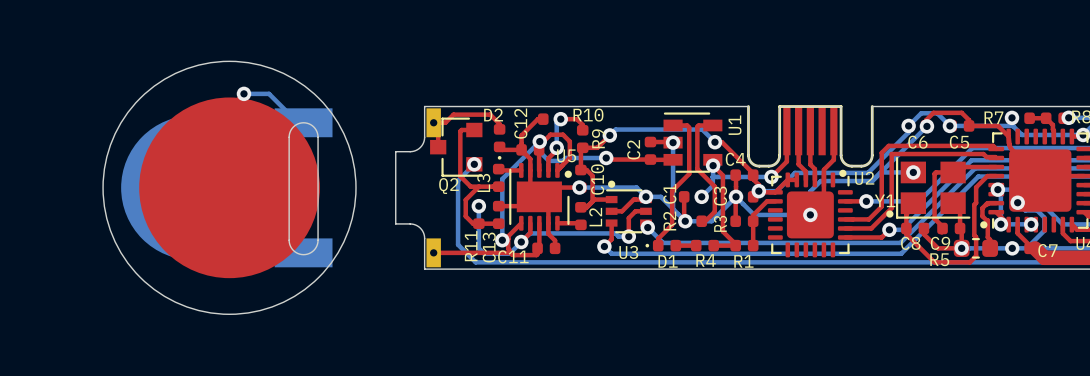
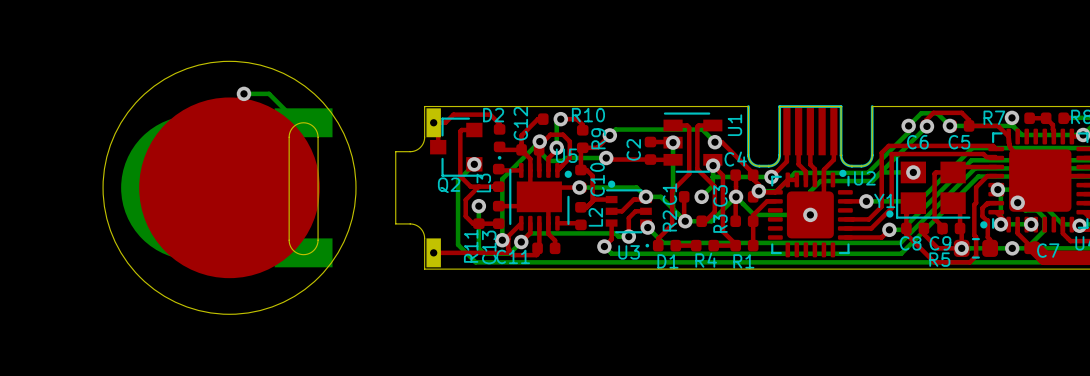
via: (1068, 117) -> none
via: none -> (1079, 225)

